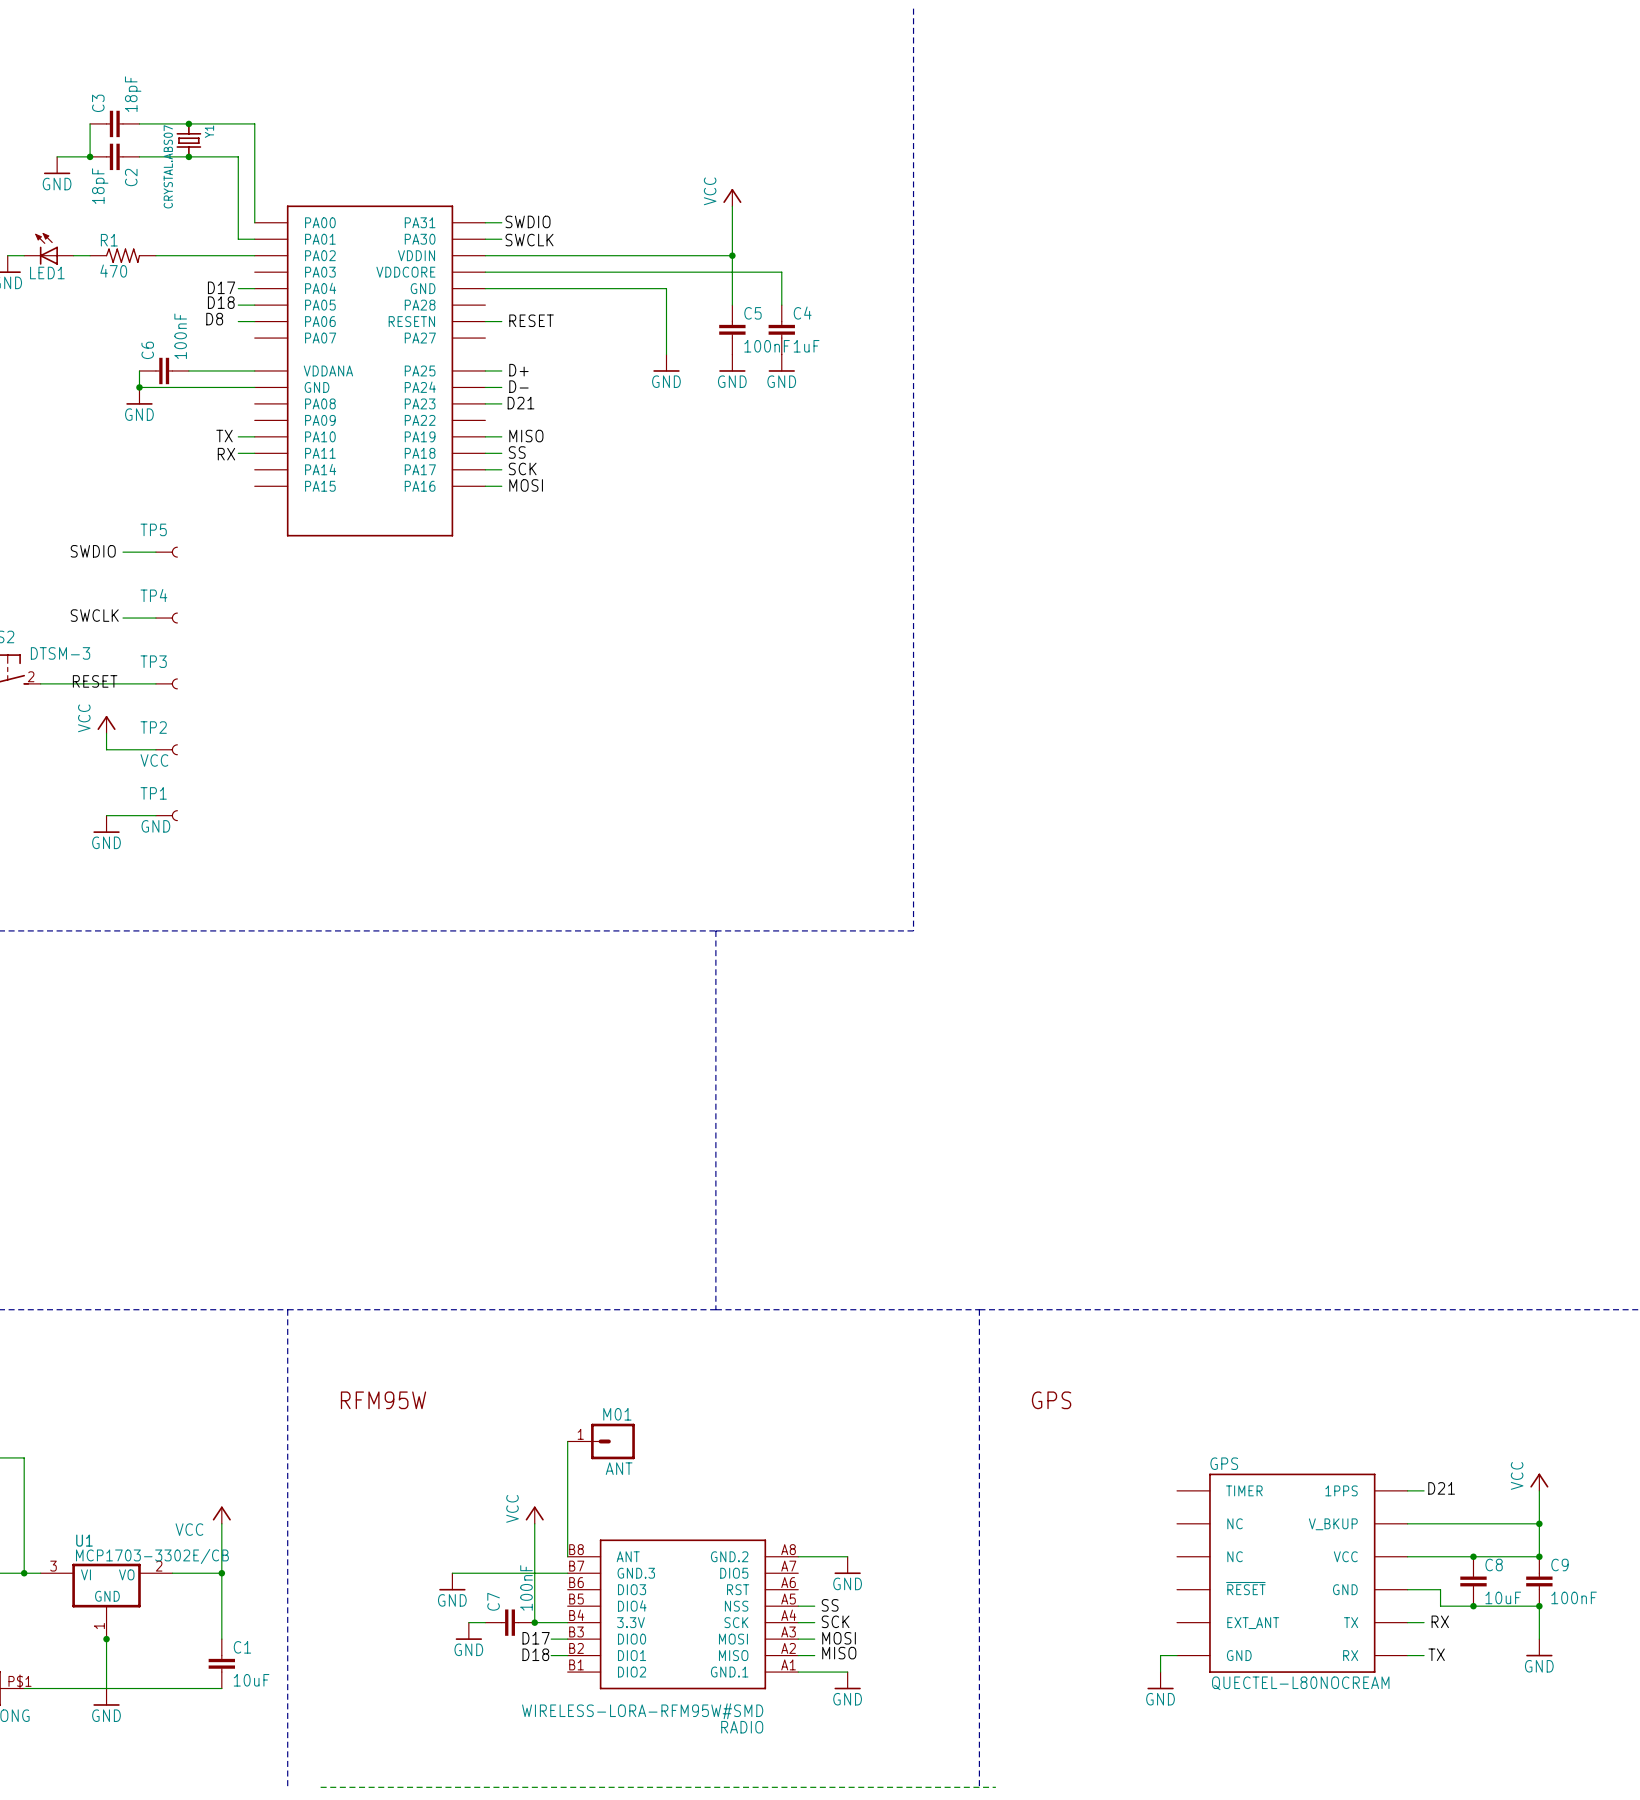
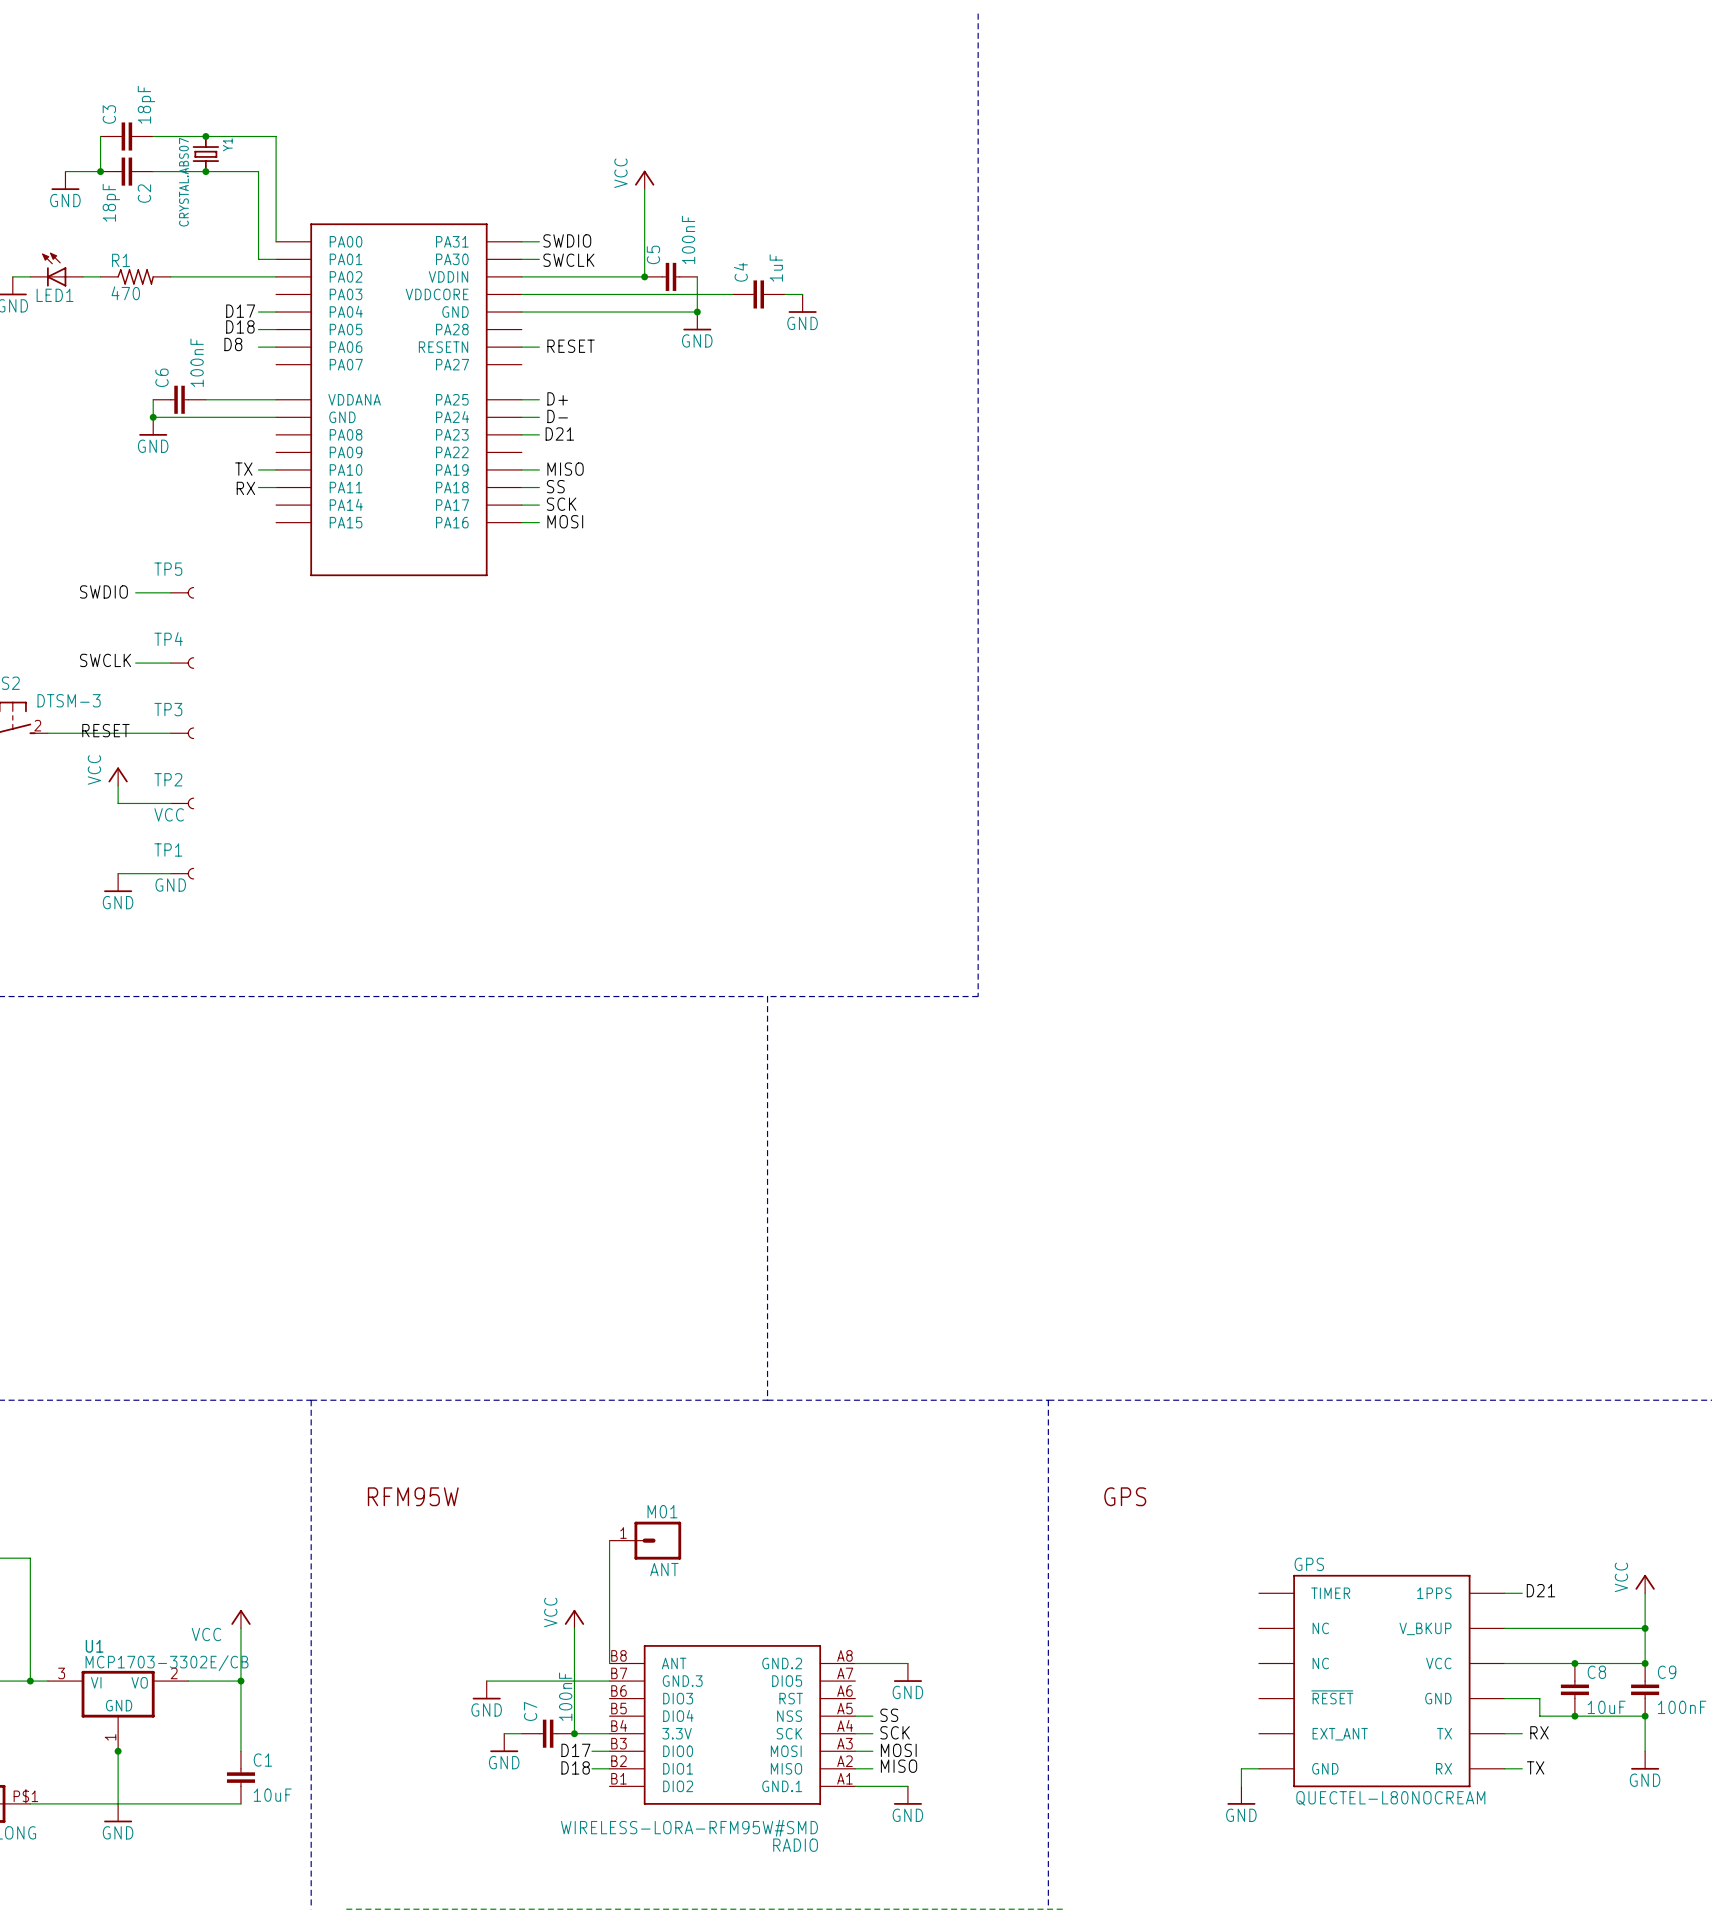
power symbol position: VCC (732, 197) -> VCC (644, 179)
wire: (732, 206) (732, 305) -> none
wire: (600, 255) (732, 255) -> (644, 276) (644, 189)
junction: none -> (644, 276)
junction: (732, 255) -> none
wire: (748, 272) (781, 272) (781, 305) -> none
power symbol: none -> GND (802, 303)
wire: (650, 288) (666, 288) (666, 354) -> (697, 312) (697, 276)
junction: none -> (697, 312)
power symbol: none -> GND (697, 321)
C5 name position: C5 (752, 313) -> C5 (653, 254)
C4 name position: C4 (802, 313) -> C4 (740, 272)
C5 rotation: 0° (732, 329) -> 90° clockwise (671, 276)
C5 position: (732, 329) -> (671, 276)
C4 rotation: 0° (781, 329) -> 90° clockwise (758, 294)
C4 position: (781, 329) -> (758, 294)
C5 value position: 100nF (767, 346) -> 100nF (688, 239)
C4 value position: 1uF (806, 346) -> 1uF (776, 268)
power symbol: GND (666, 363) -> none
power symbol: GND (732, 363) -> none
power symbol: GND (781, 363) -> none

